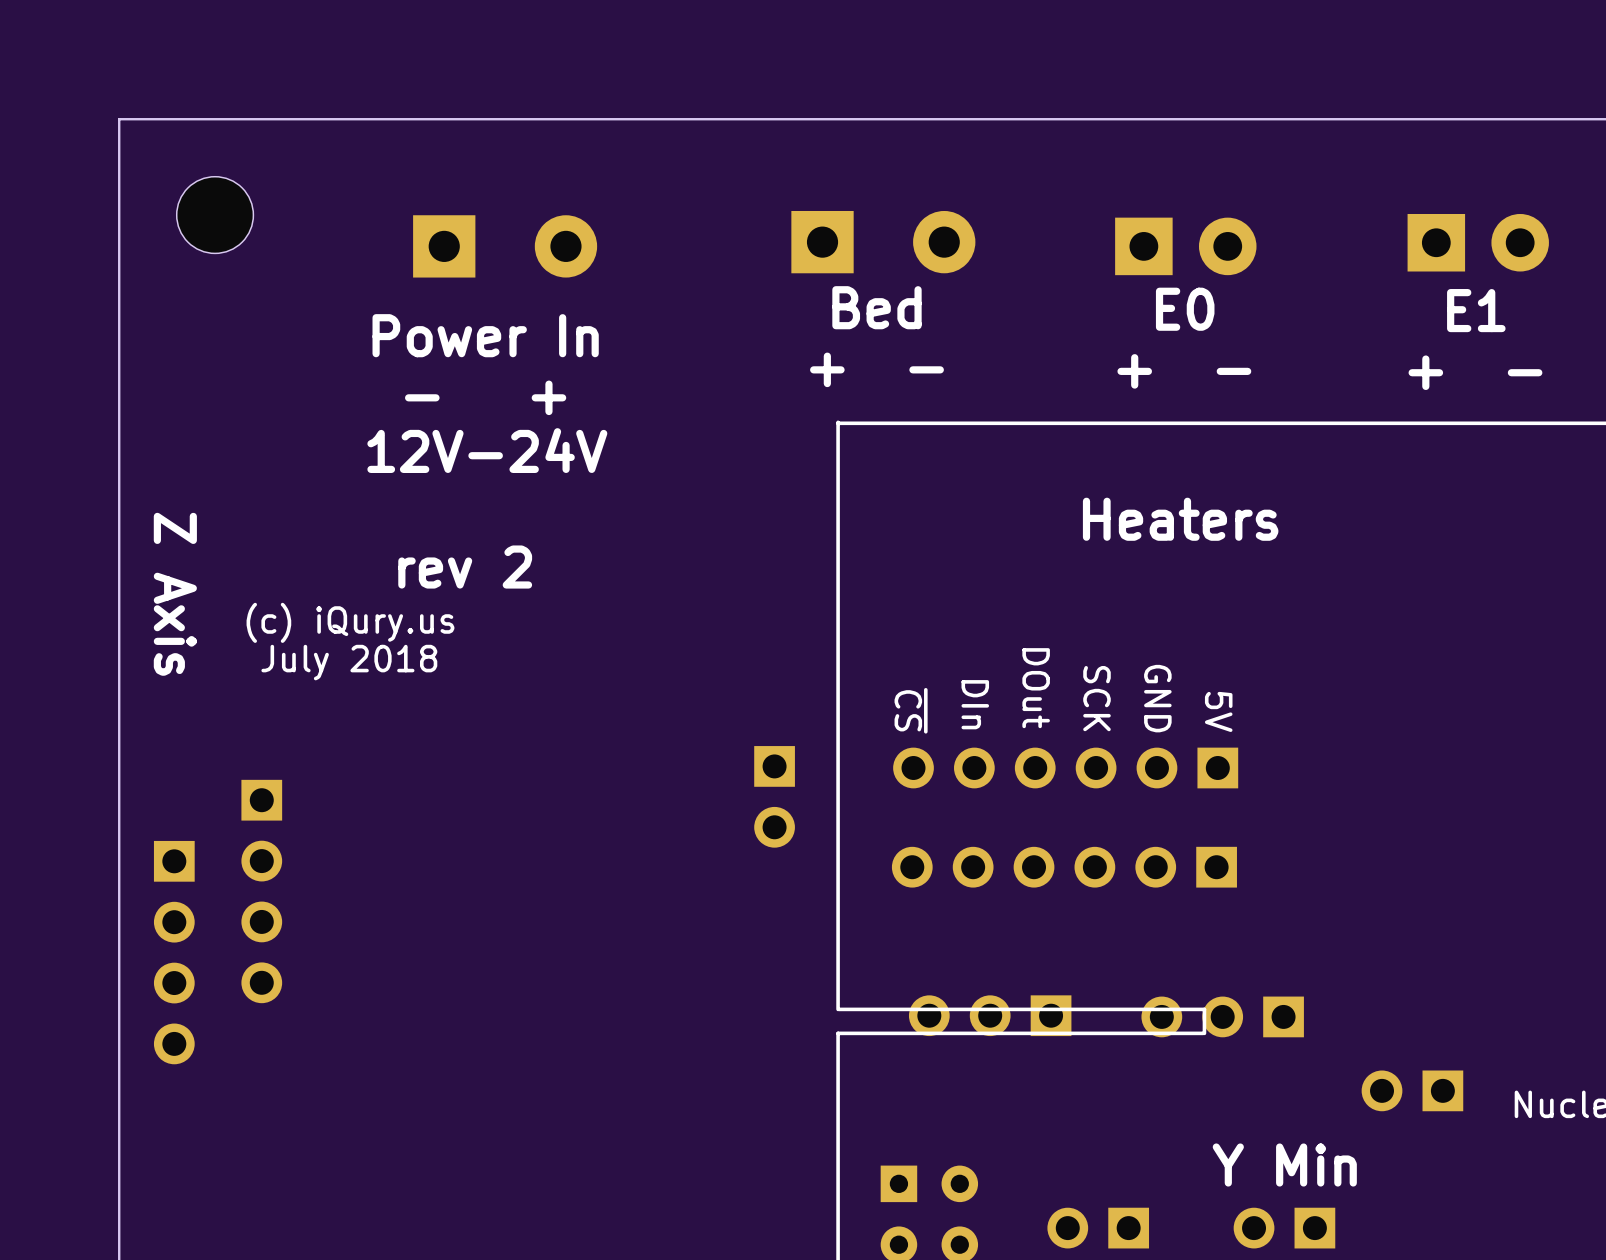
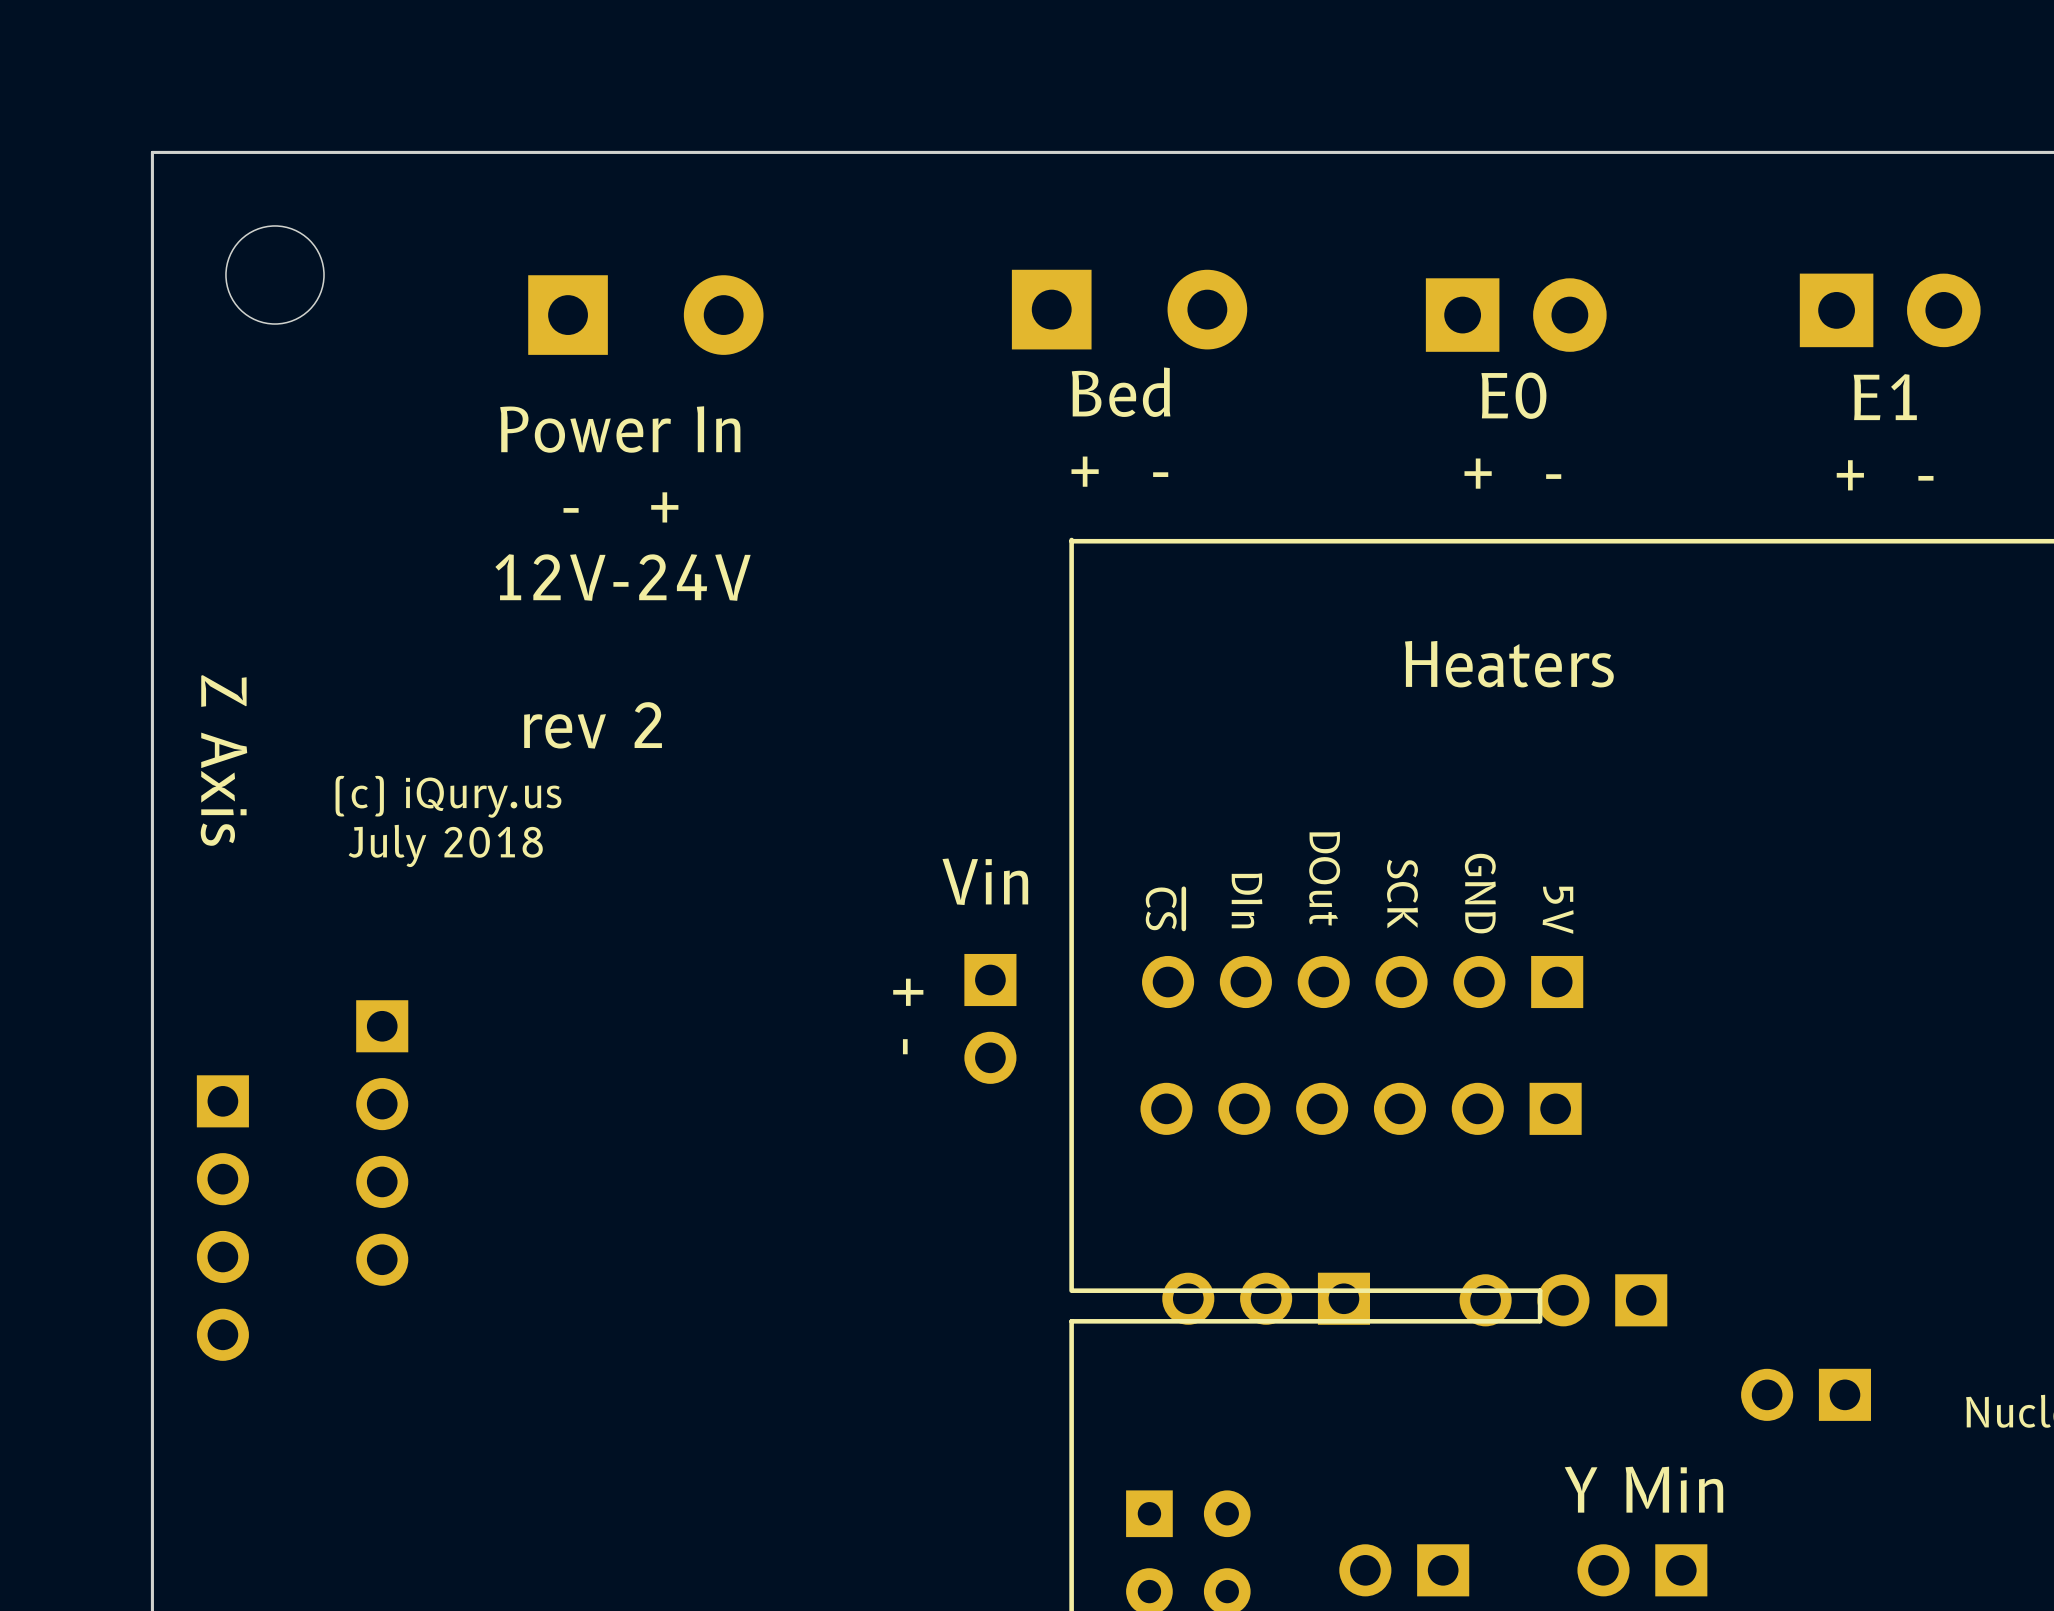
text: none -> Vin (985, 881)
text: none -> + - (908, 1016)
part position: (261, 891) -> (382, 1143)

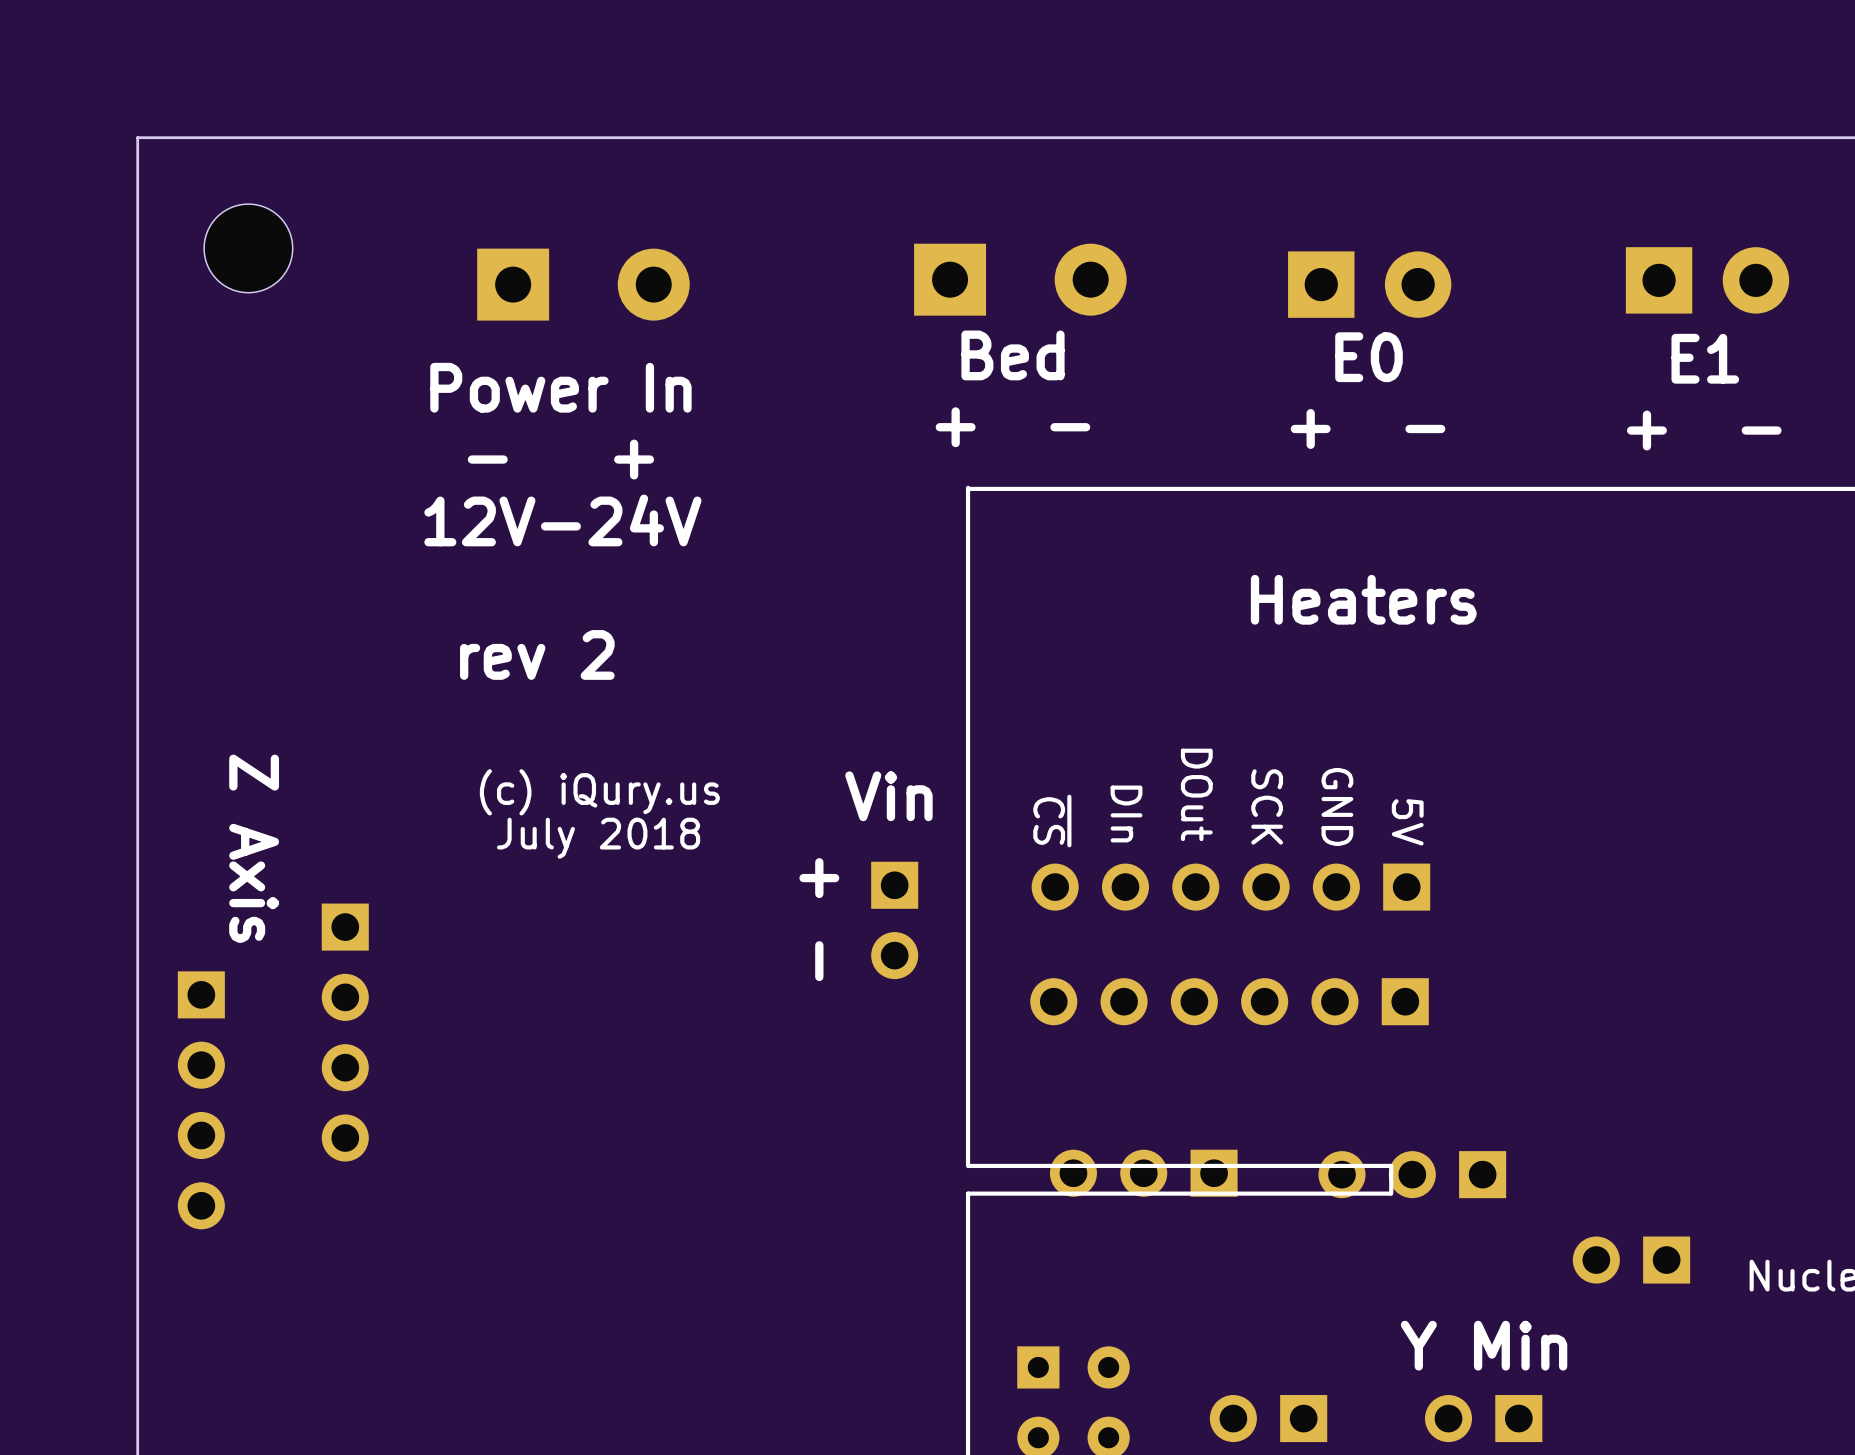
text position: Z Axis (223, 760) -> Z Axis (254, 848)
text position: (c) iQury.us (448, 796) -> (c) iQury.us (599, 792)
text position: July 2018 (445, 845) -> July 2018 (598, 838)

